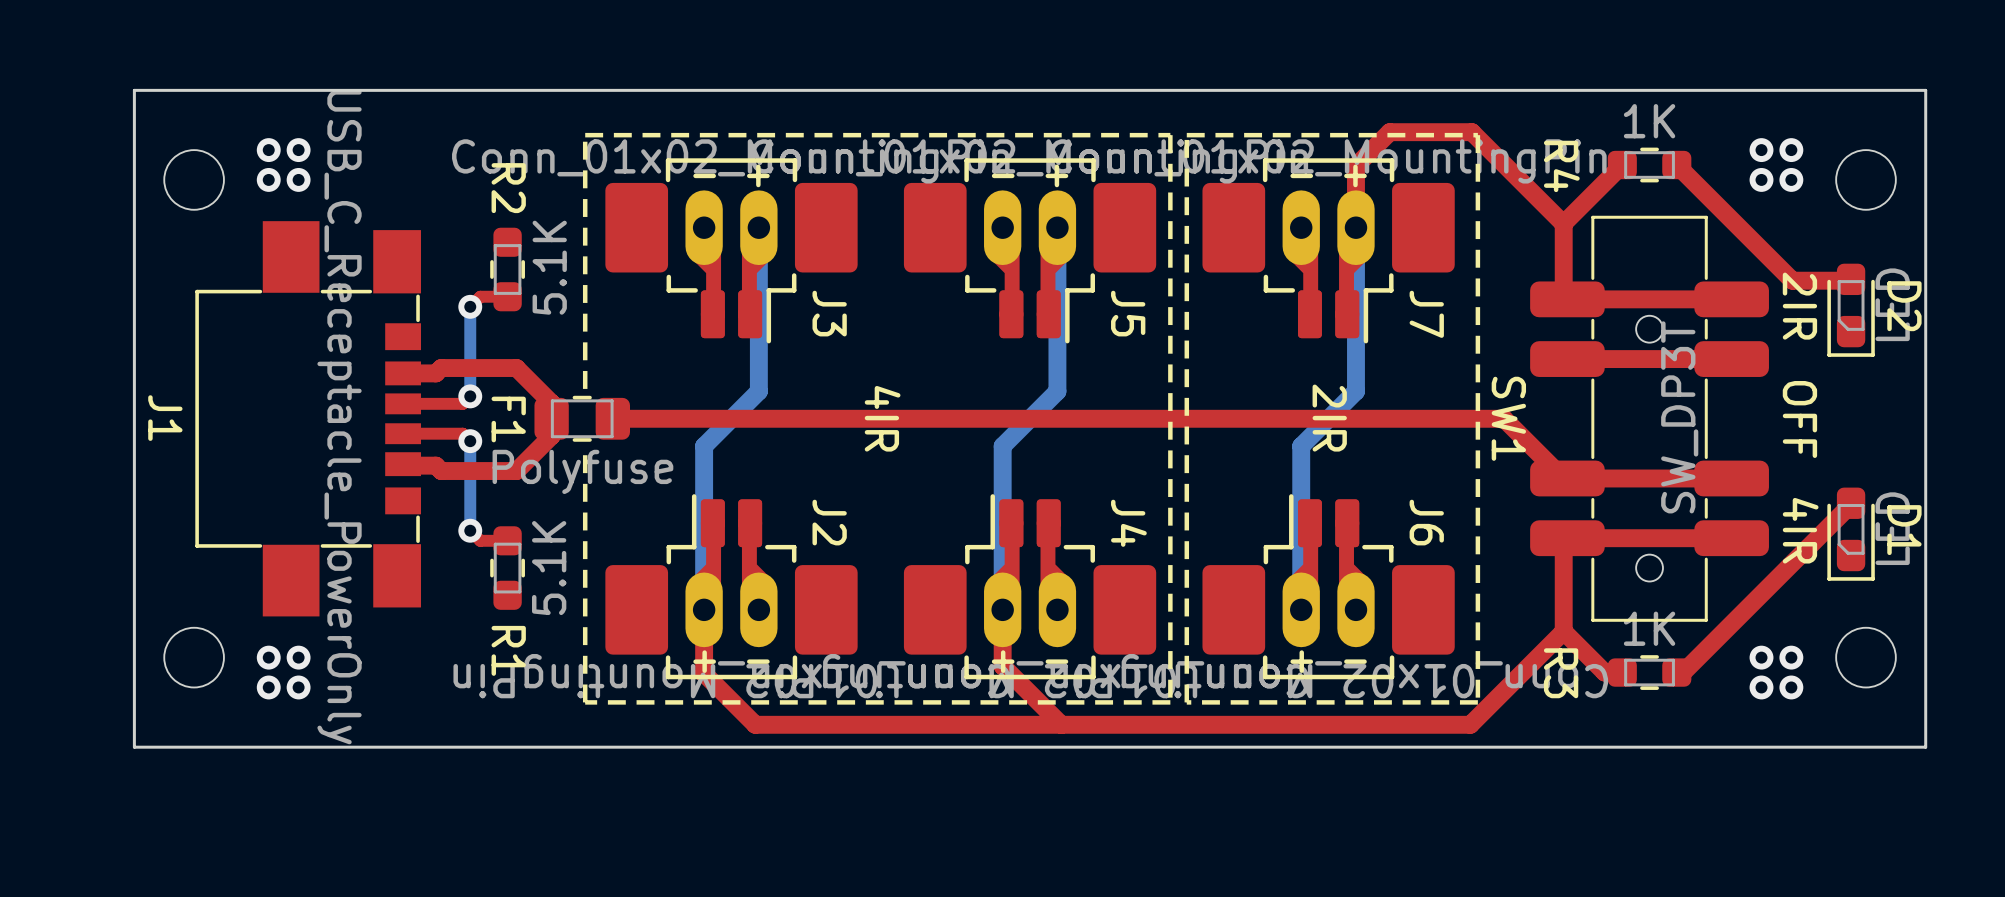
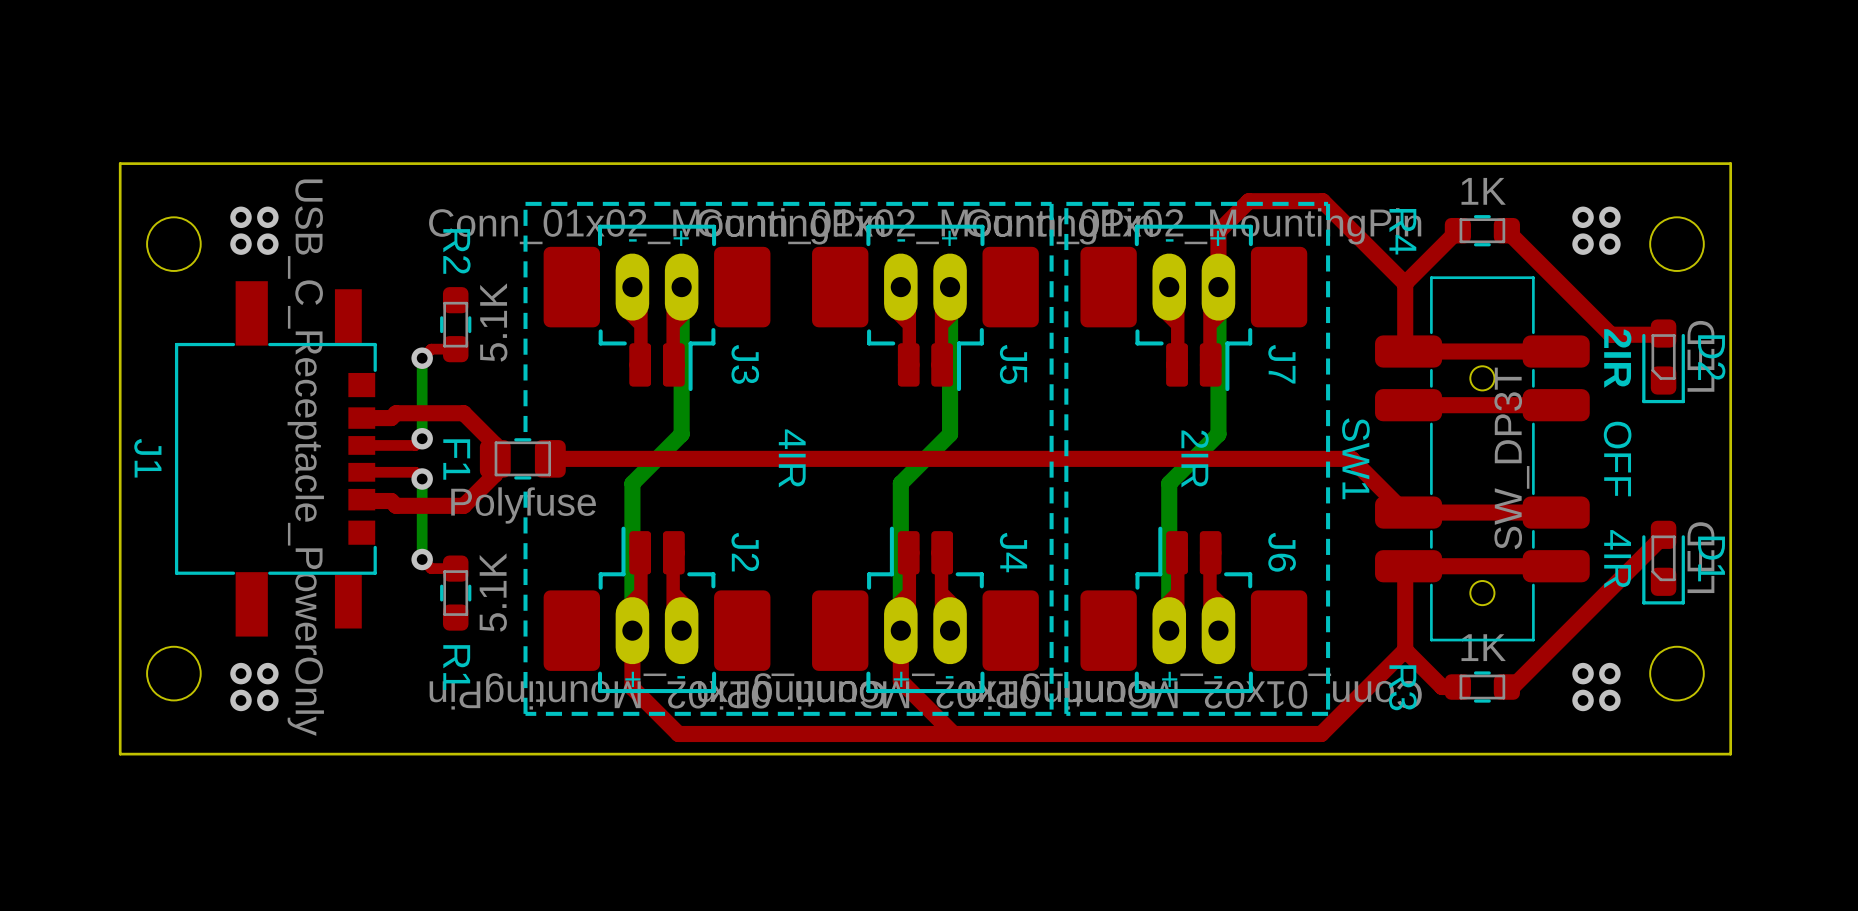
J1 footprint: [195, 221, 422, 617] -> [174, 281, 377, 637]

